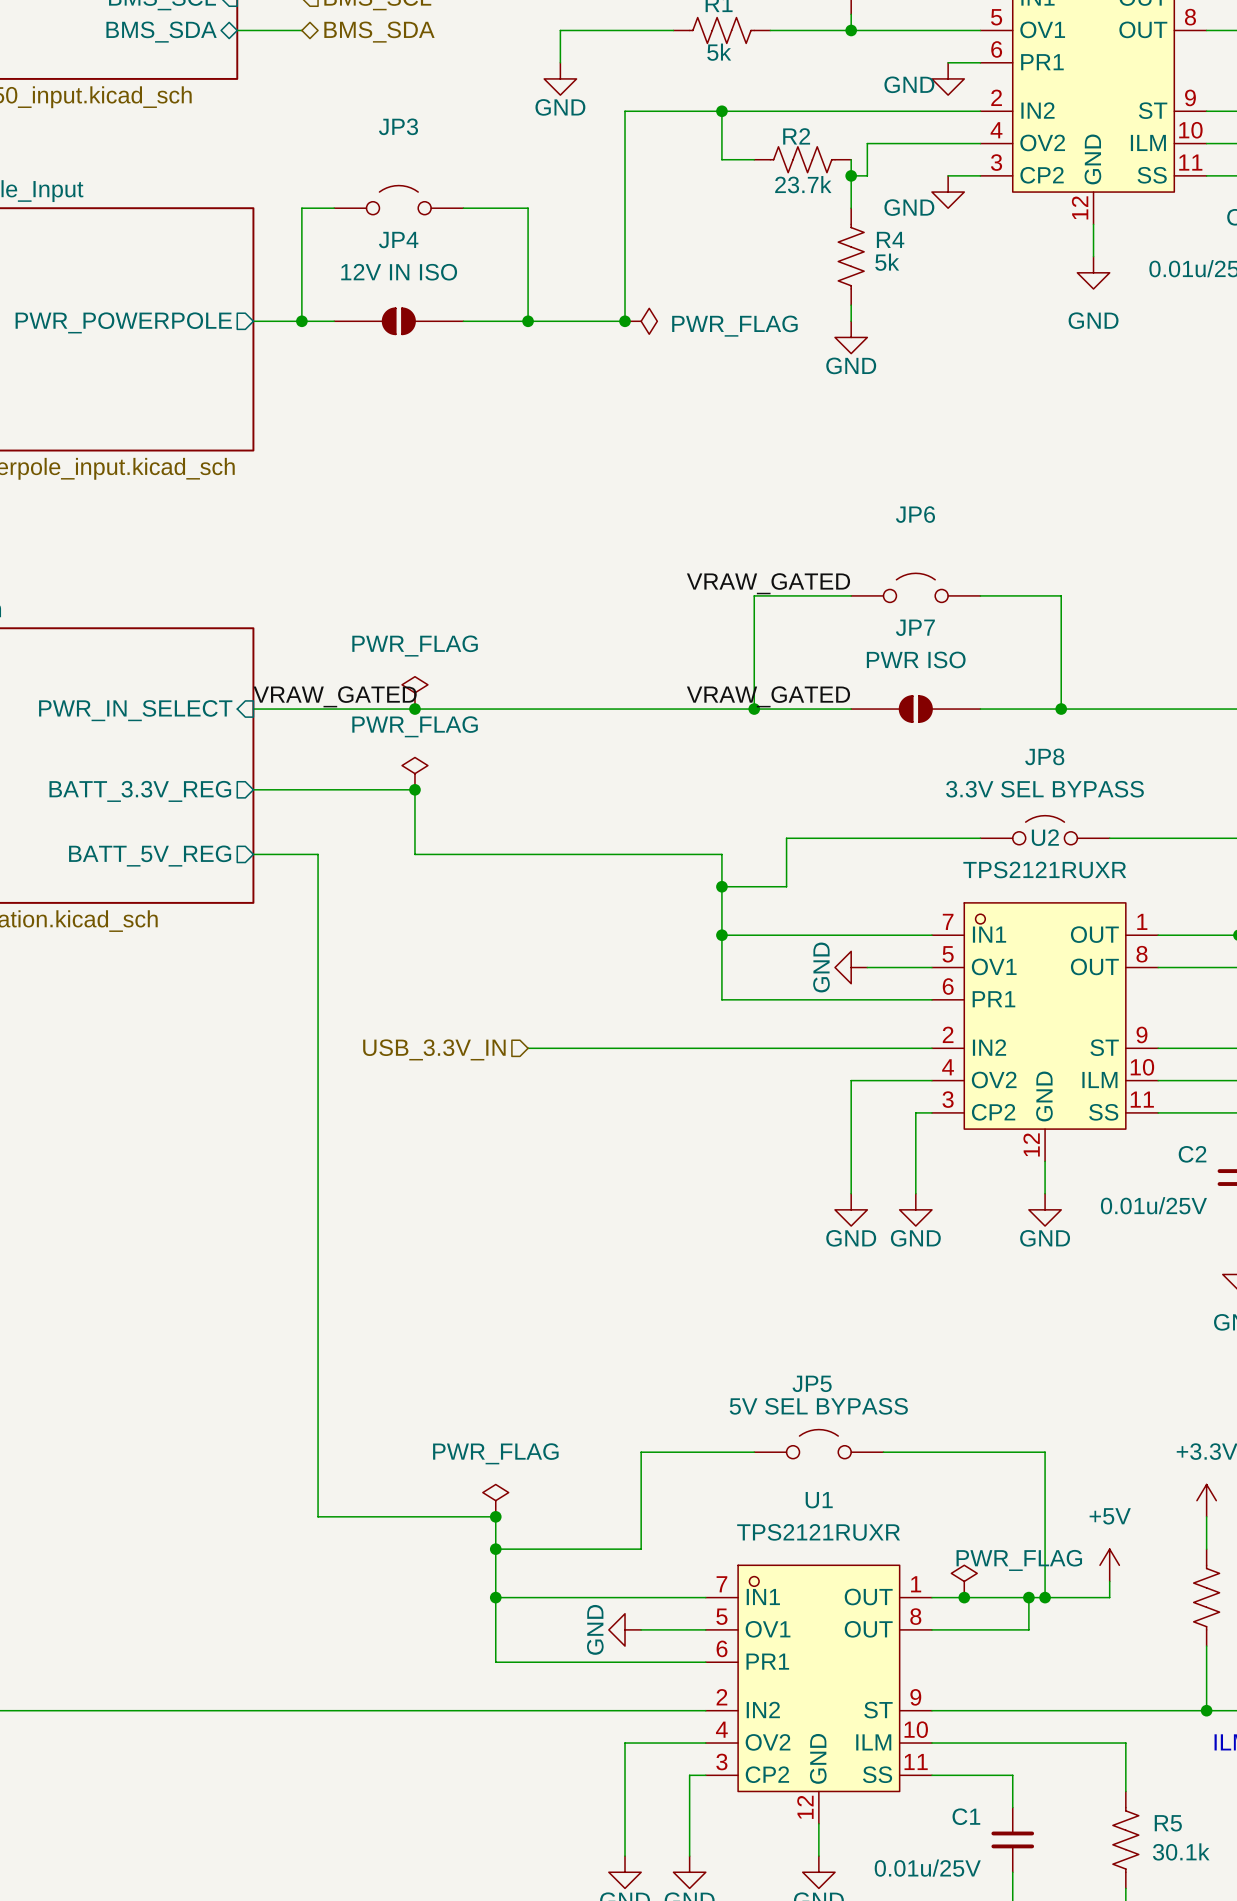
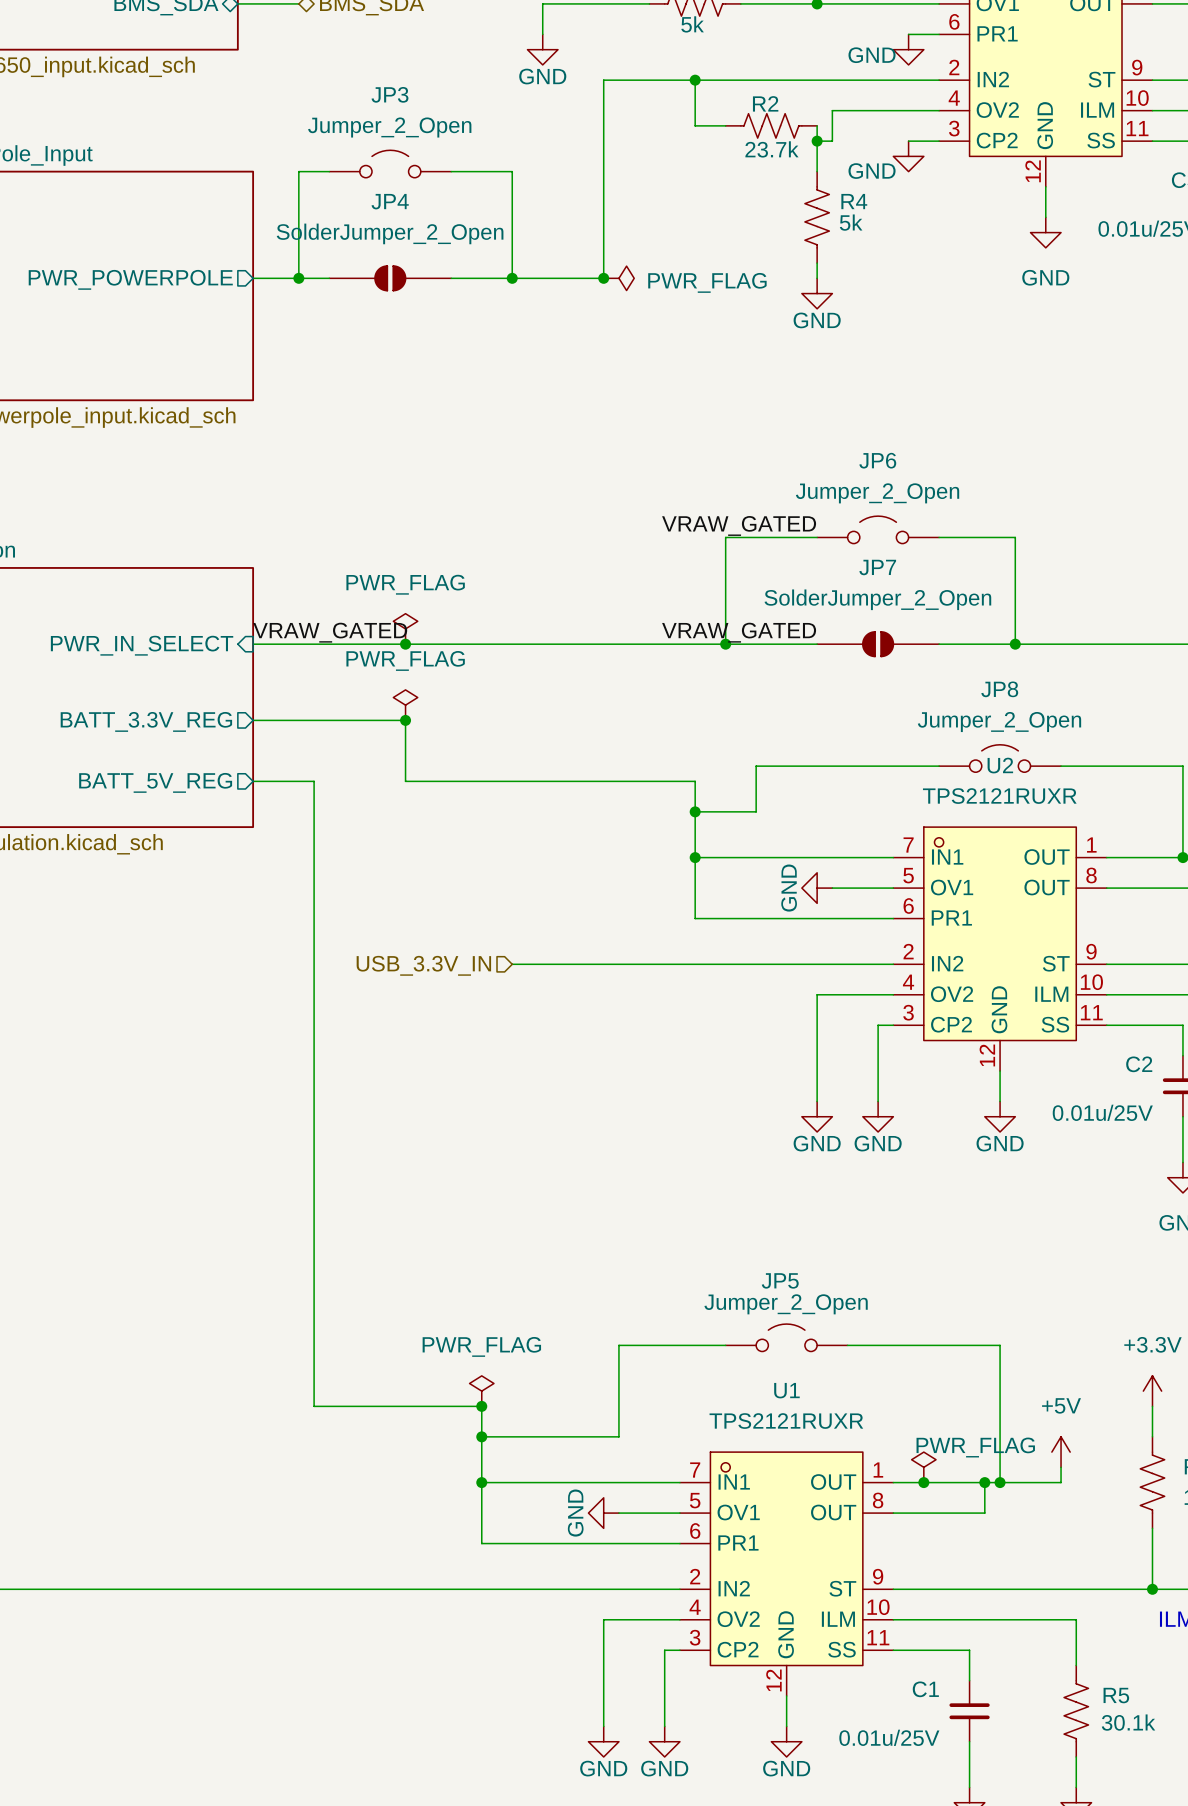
JP3 value: none -> Jumper_2_Open (389, 127)
JP4 value: 12V IN ISO (399, 272) -> SolderJumper_2_Open (390, 233)
JP6 value: none -> Jumper_2_Open (877, 493)
JP7 value: PWR ISO (916, 659) -> SolderJumper_2_Open (877, 599)
JP8 value: 3.3V SEL BYPASS (1044, 789) -> Jumper_2_Open (999, 722)
JP5 value: 5V SEL BYPASS (818, 1406) -> Jumper_2_Open (786, 1304)

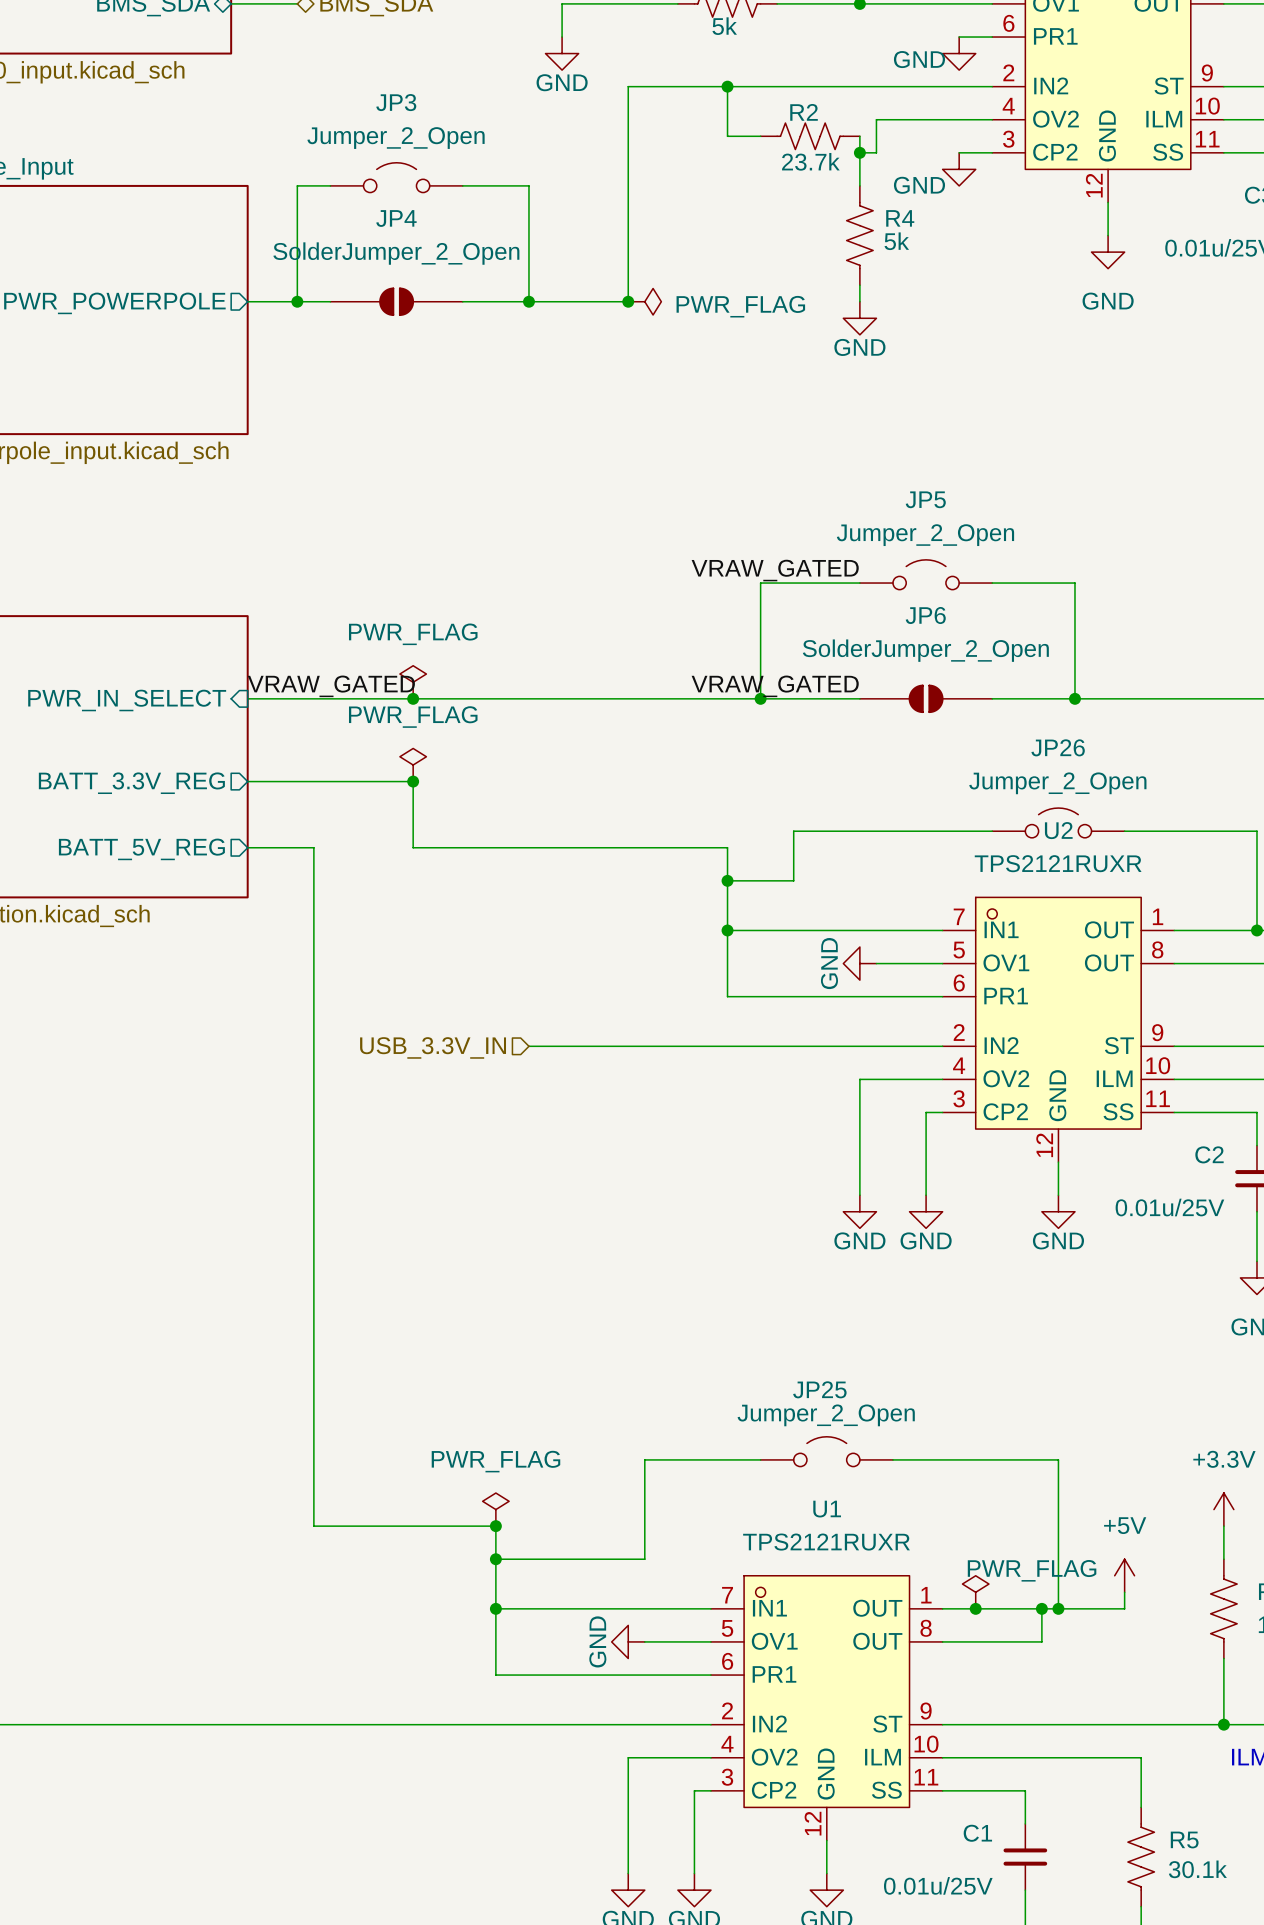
JP6 name: JP6 (877, 460) -> JP5 (925, 499)
JP7 name: JP7 (877, 567) -> JP6 (925, 615)
JP8 name: JP8 (999, 689) -> JP26 (1058, 747)
JP5 name: JP5 (780, 1280) -> JP25 (819, 1389)

